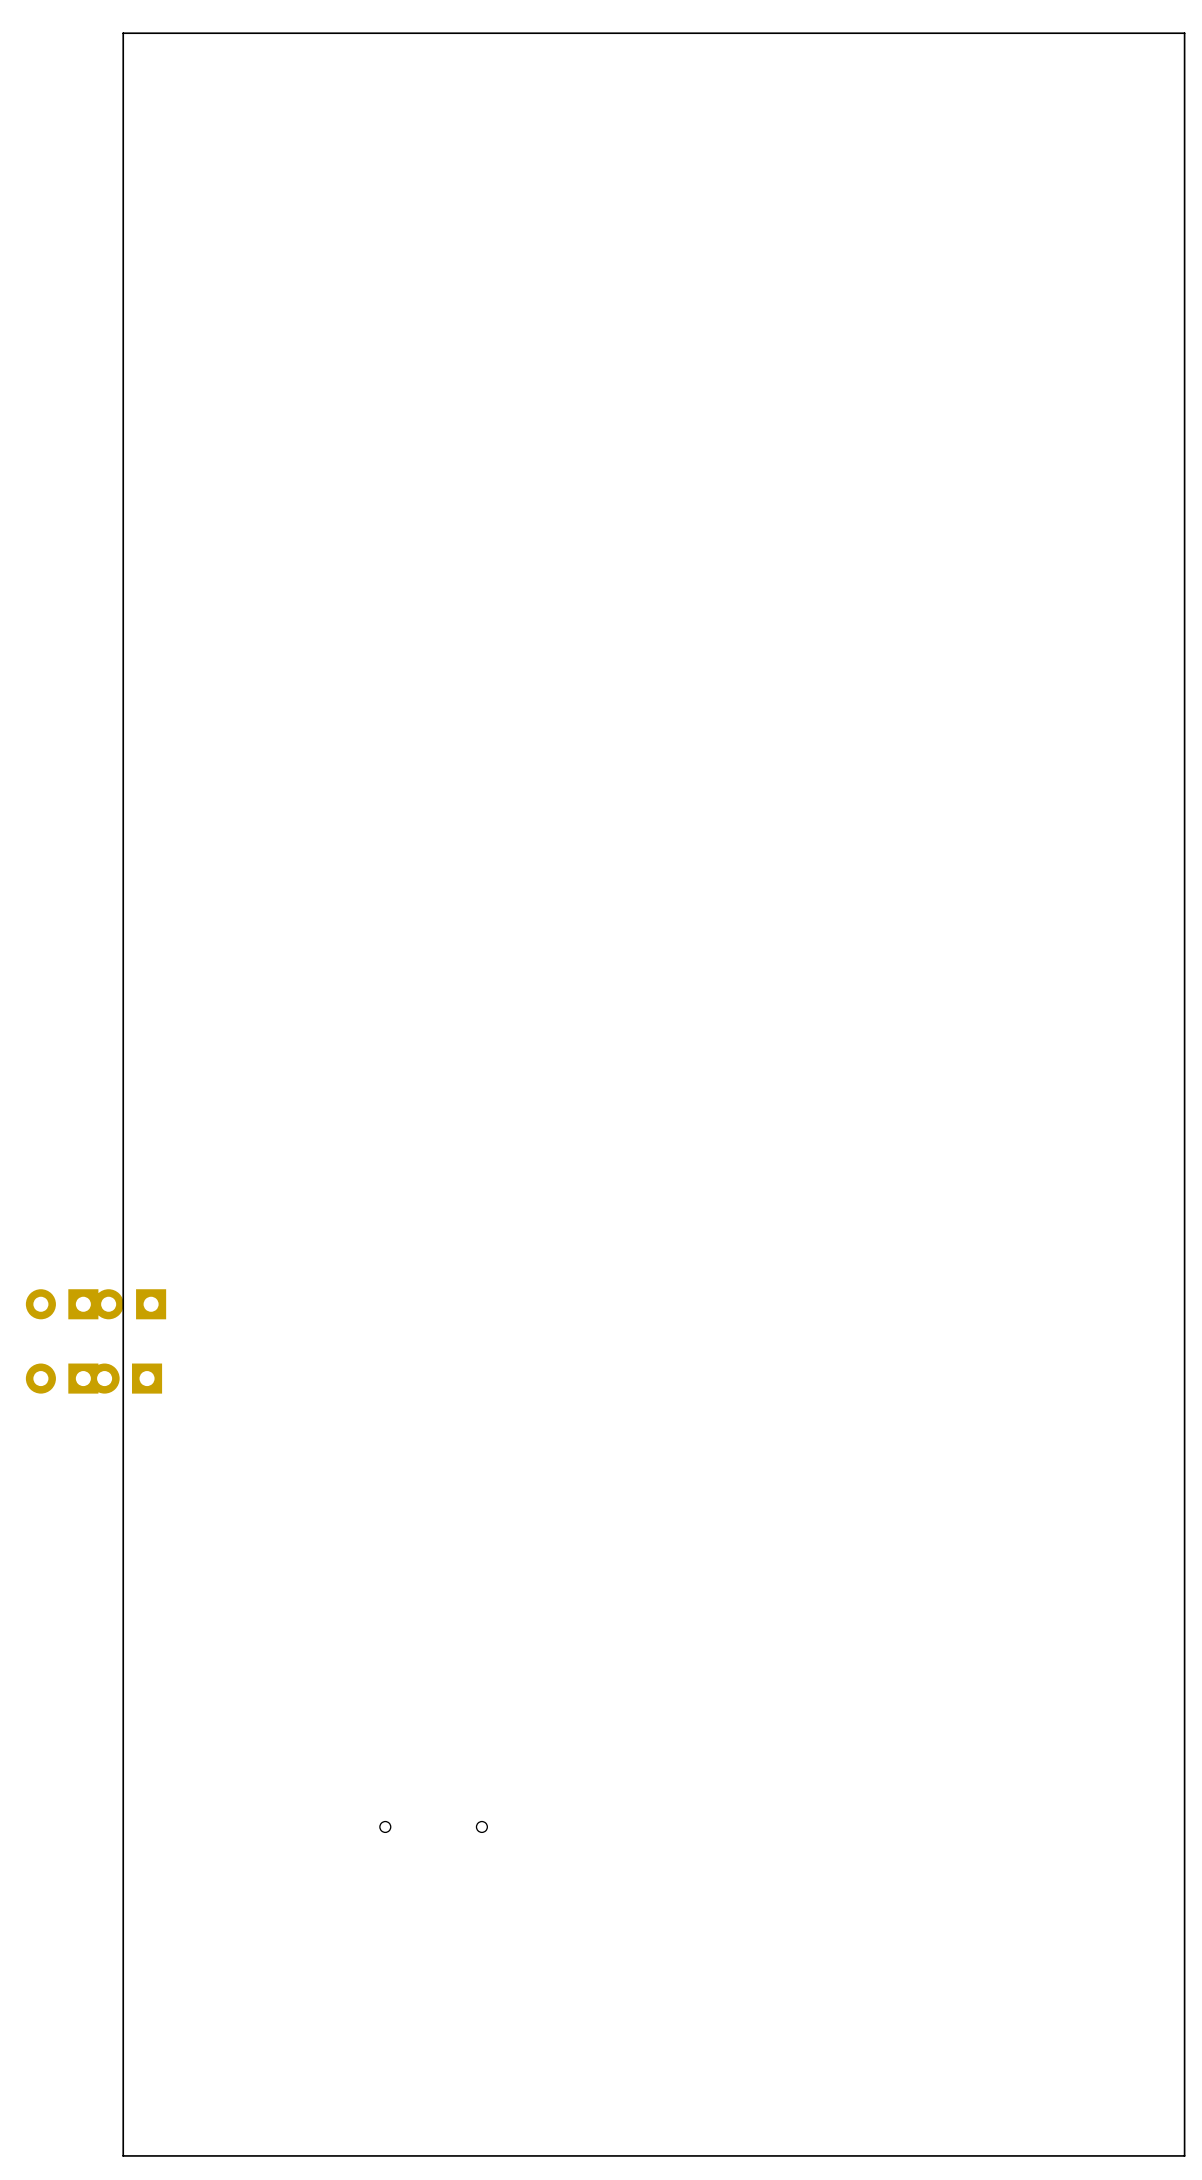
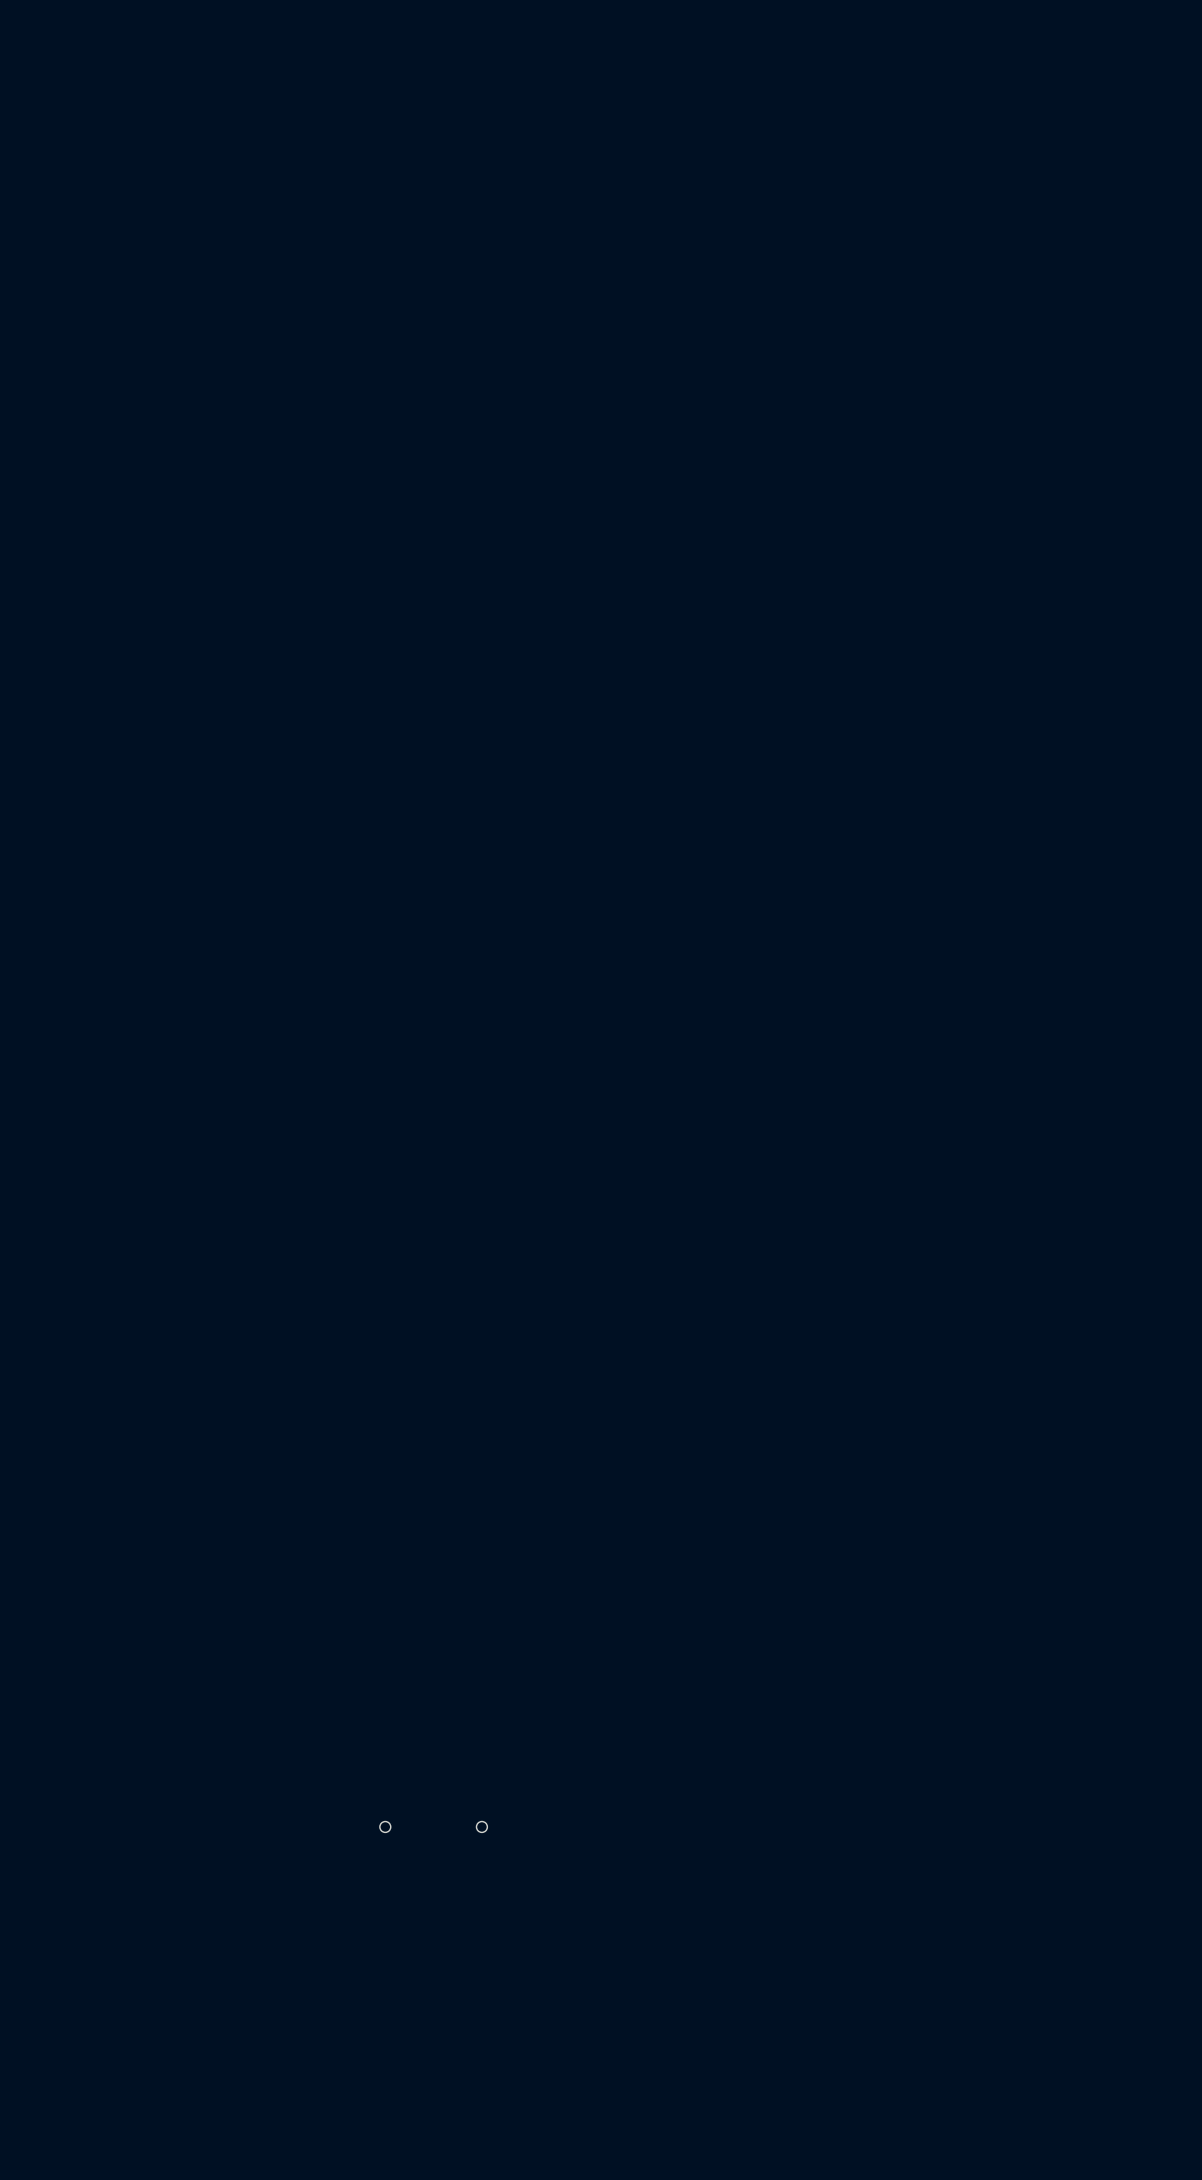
board edge: (1184, 33) (123, 33) (123, 2155) (1184, 2155) (1184, 33) -> none
part: (62, 1304) -> none
part: (129, 1304) -> none
part: (62, 1378) -> none
part: (125, 1378) -> none

